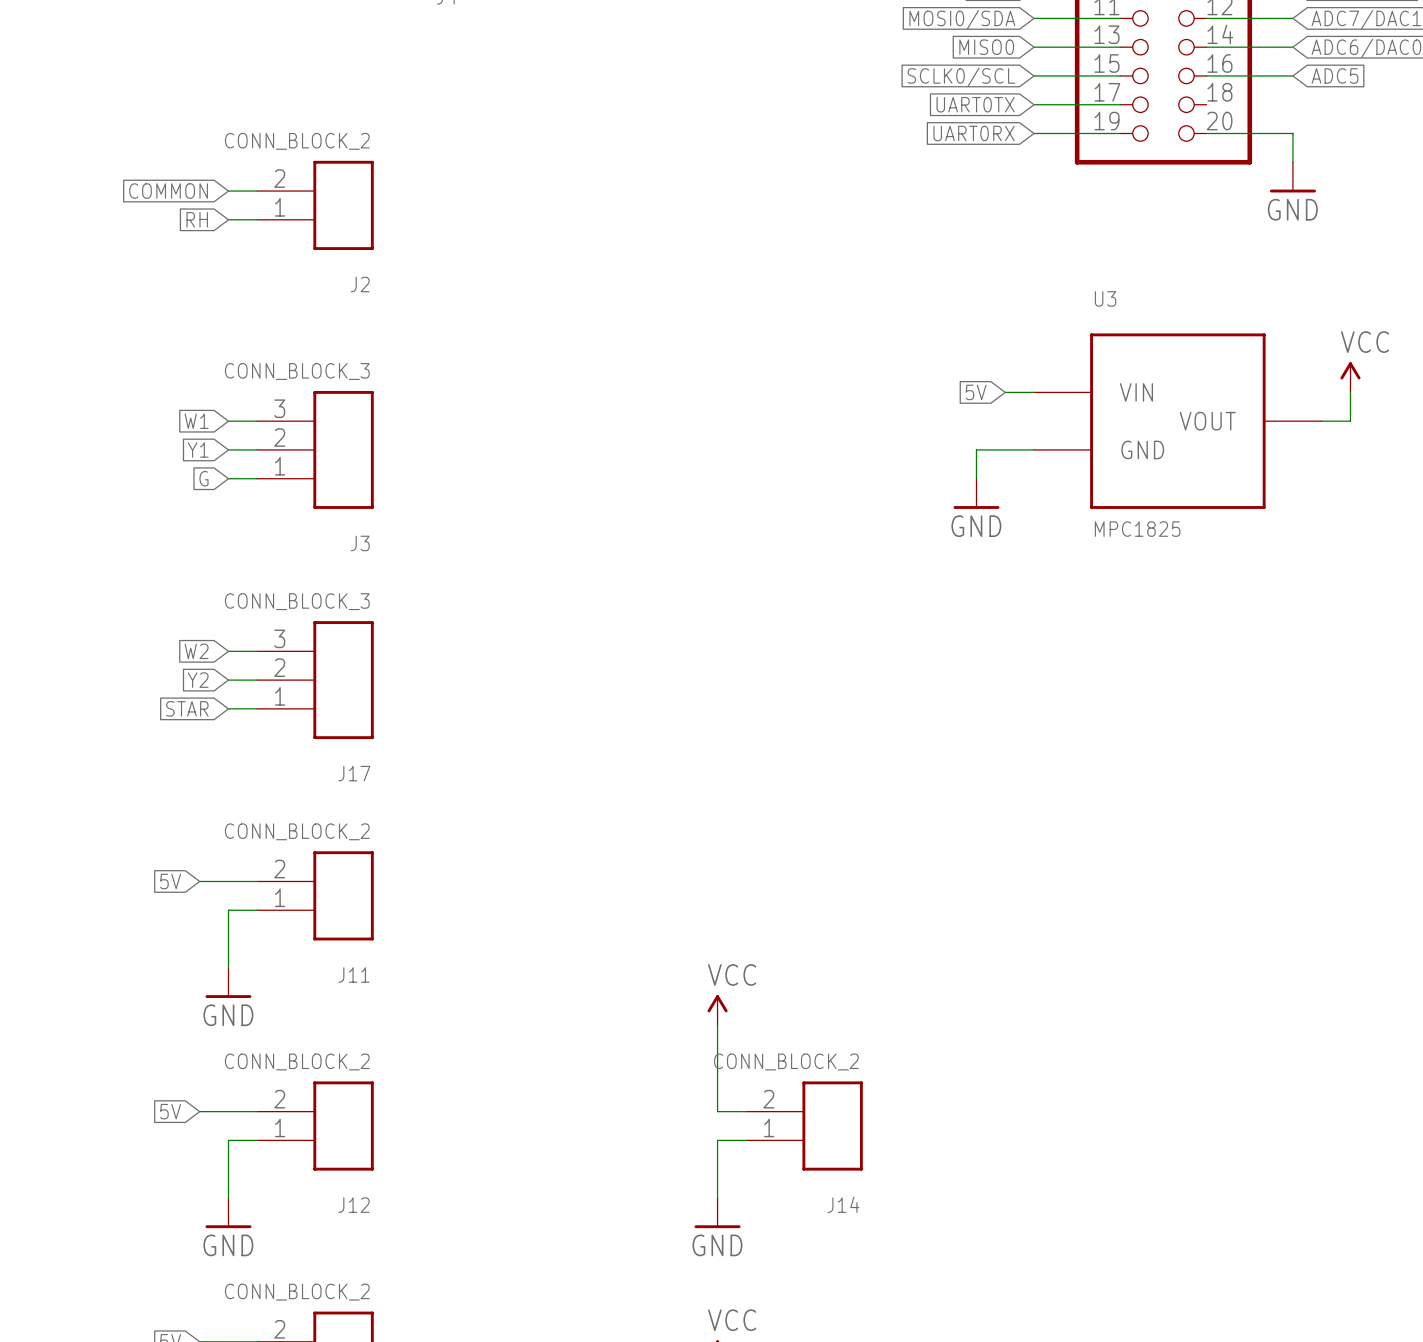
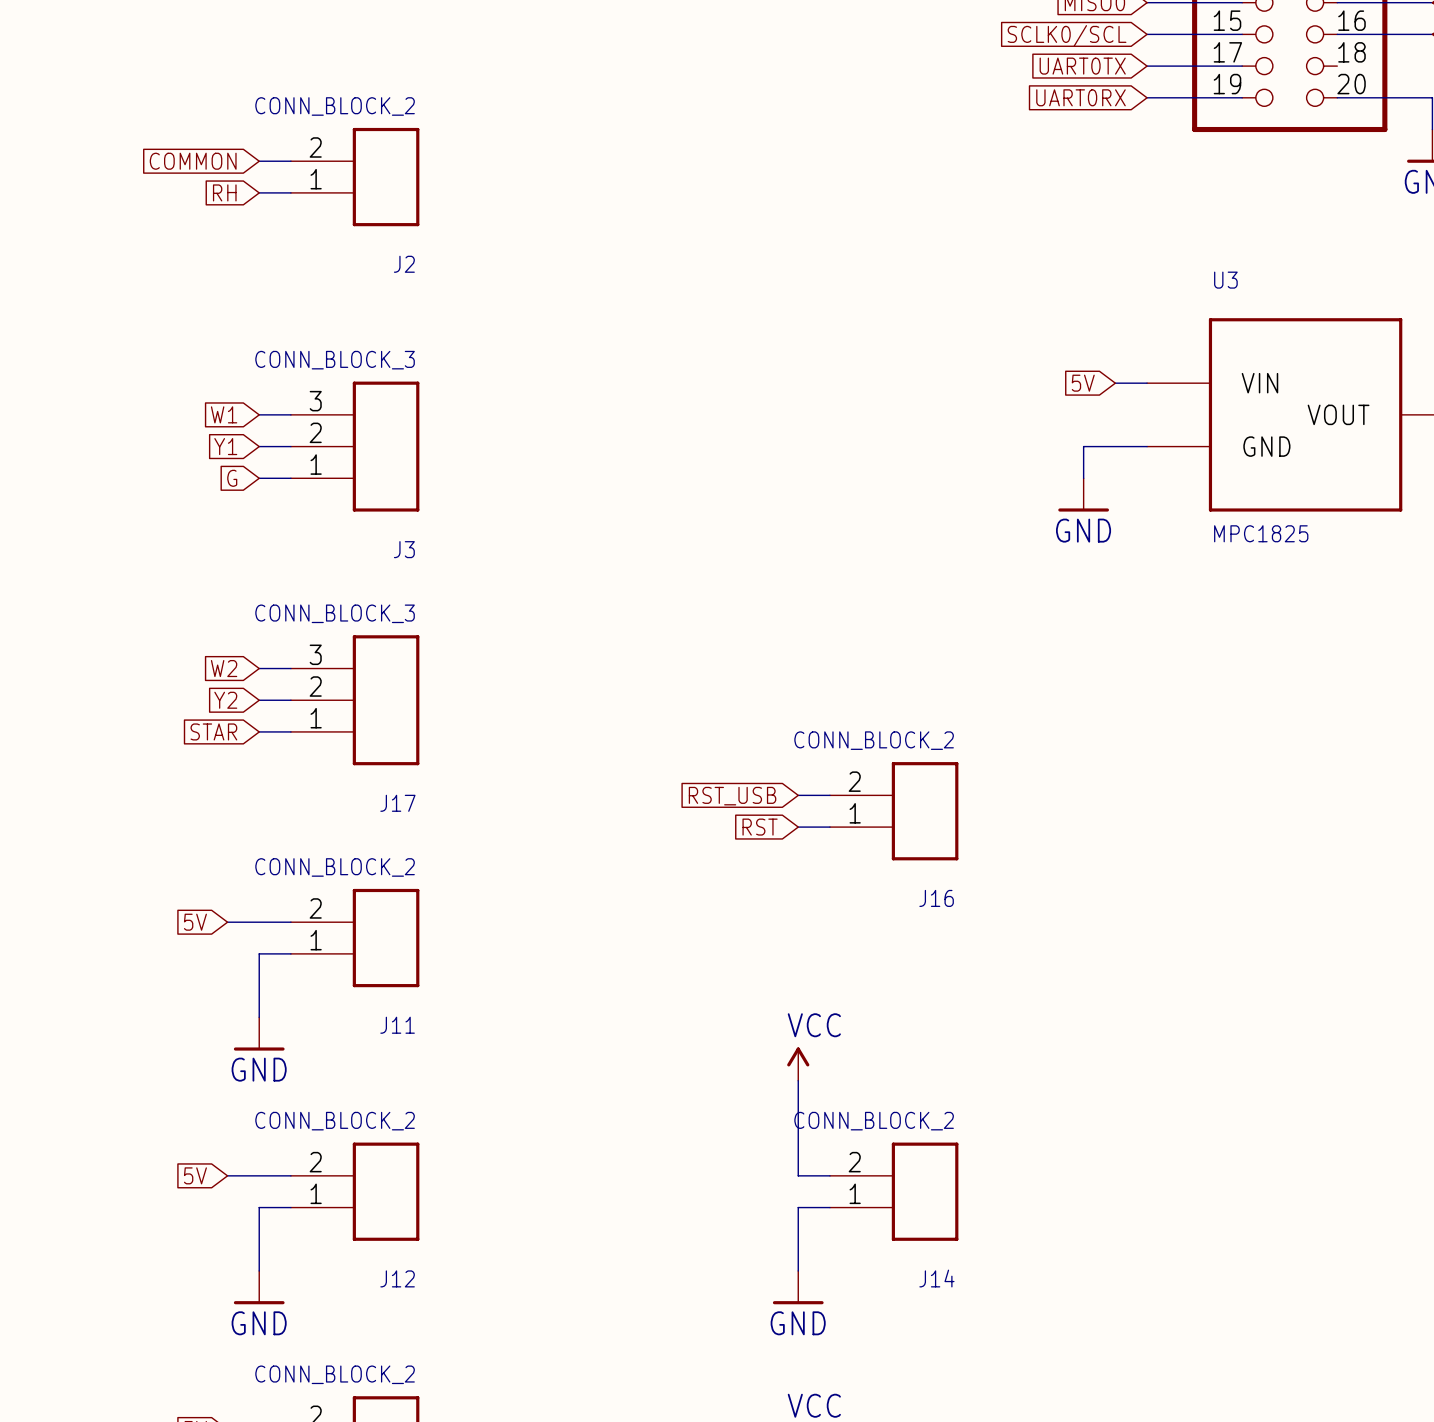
wire: none -> (798, 795) (829, 795)
global label: none -> RST_USB (732, 796)
J16: none -> CONN_BLOCK_2 (894, 811)
global label: none -> RST (760, 827)
wire: none -> (798, 827) (829, 827)

